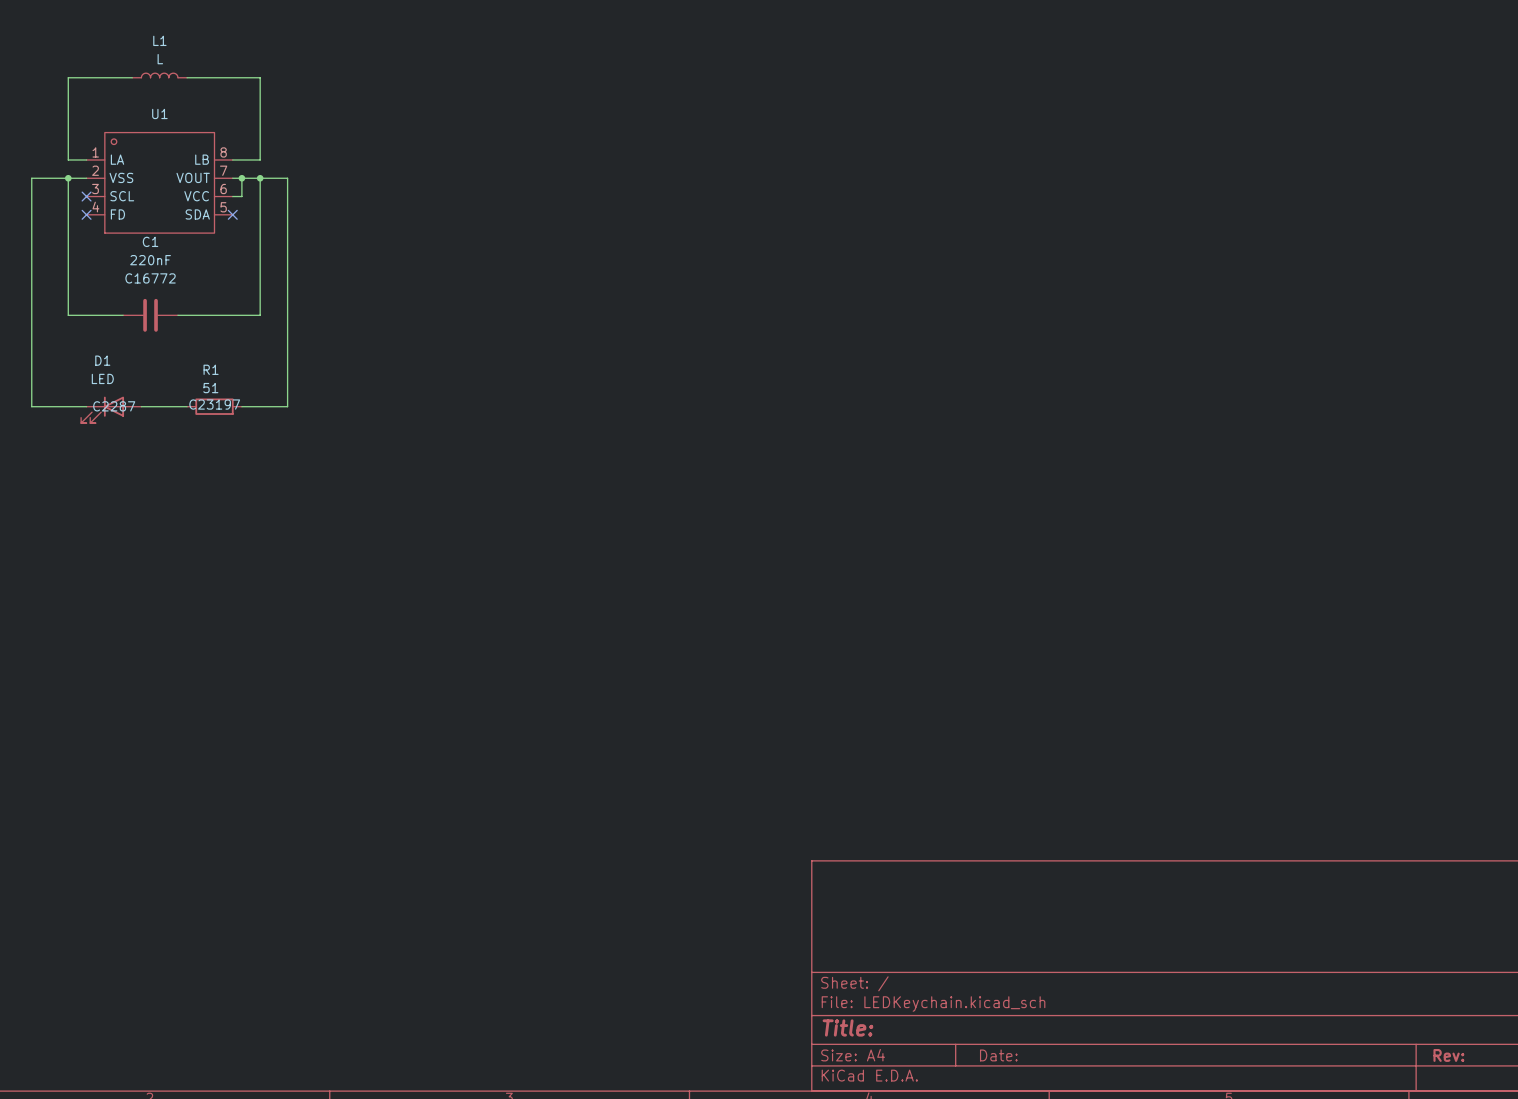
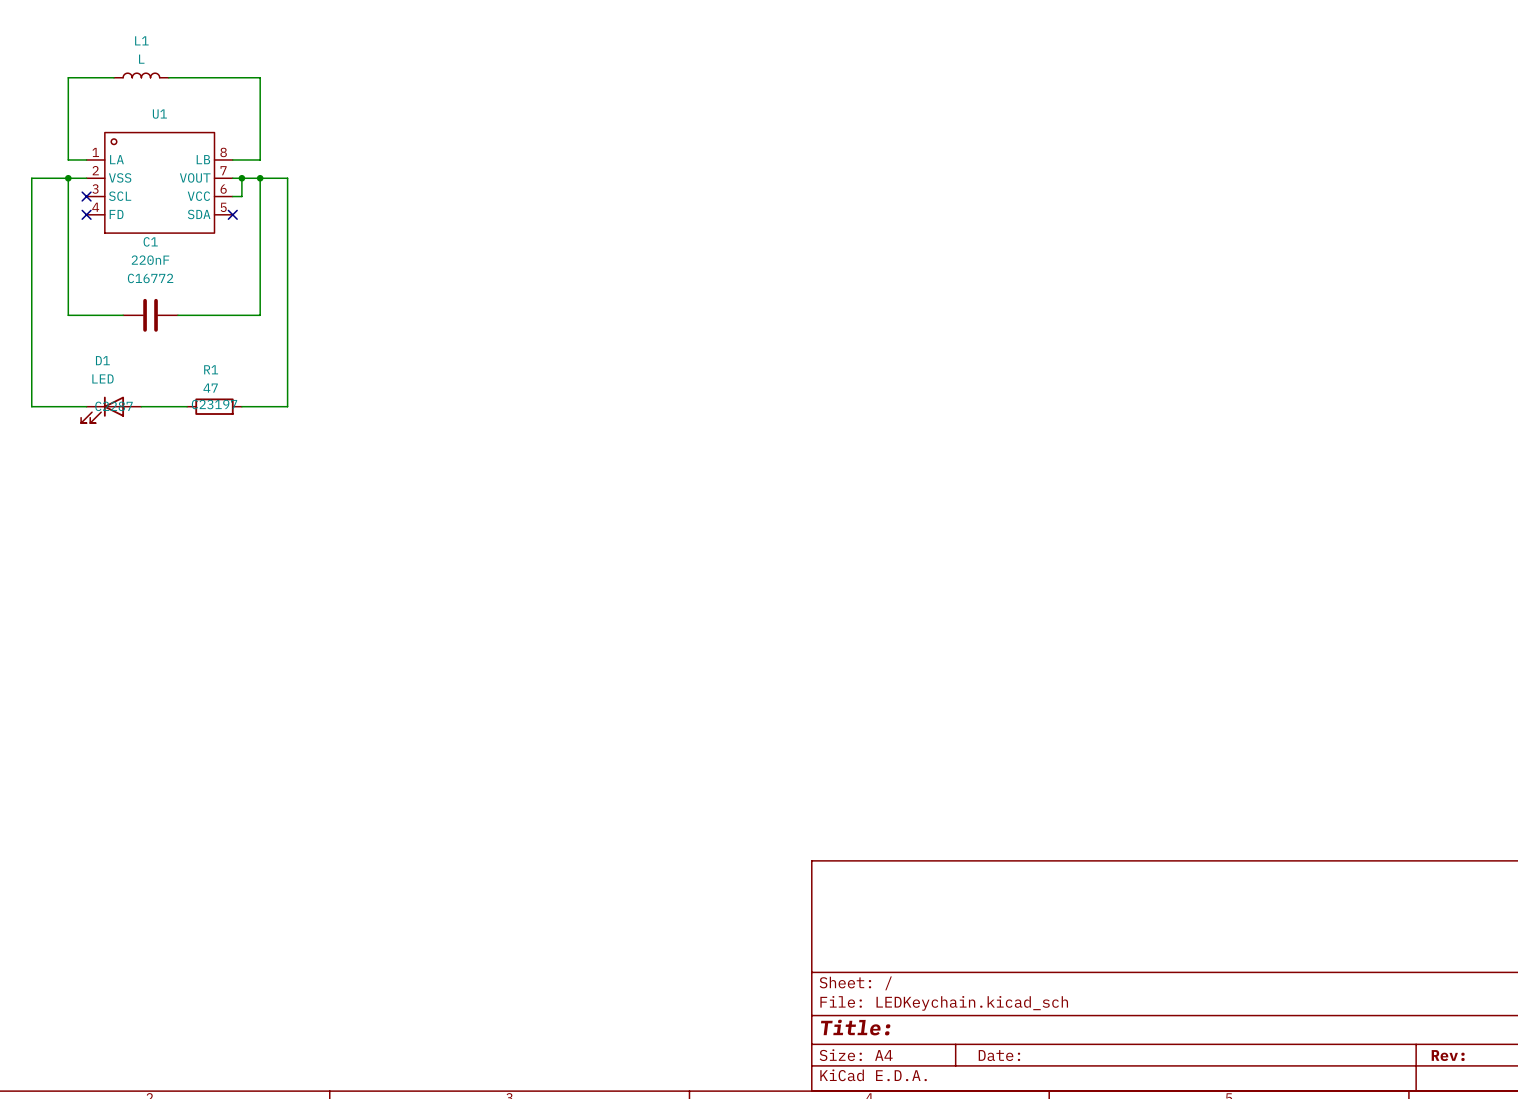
L1 position: (159, 75) -> (141, 75)
R1 value: 51 (210, 388) -> 47 (210, 388)

